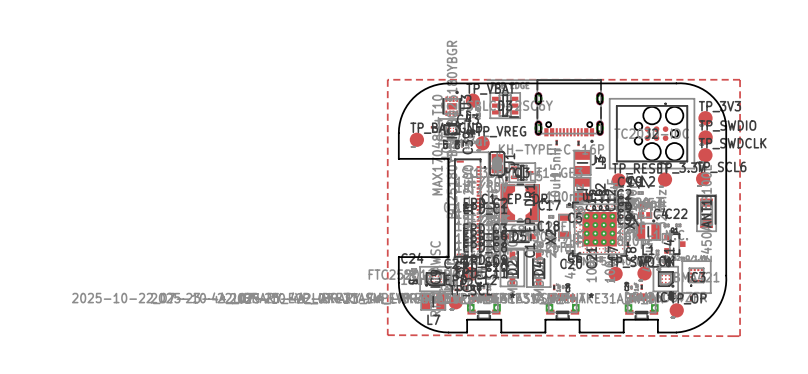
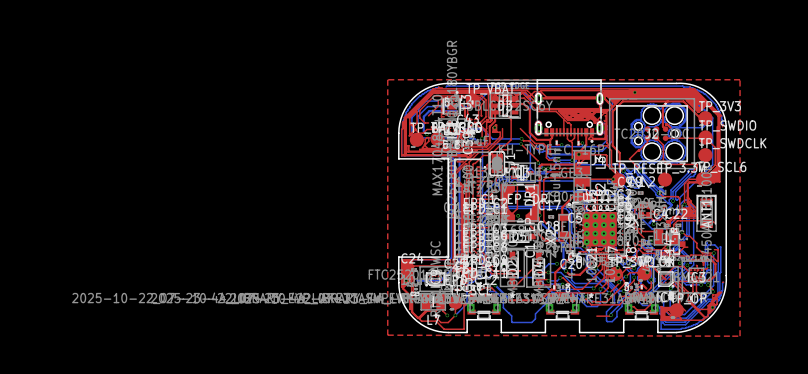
top track: none -> (438, 87) (442, 87)
bottom track: none -> (438, 87) (419, 96) (406, 112) (401, 129) (401, 155) (449, 155) (451, 157) (451, 257) (449, 259) (401, 259) (401, 279) (406, 280)
bottom track: none -> (445, 87) (690, 87) (705, 94) (716, 105) (723, 124)
top track: none -> (690, 87) (690, 87)
top track: none -> (433, 89) (405, 117) (405, 155) (466, 155)
top track: none -> (629, 89) (694, 90) (719, 115) (719, 181) (689, 181) (687, 183) (688, 197)
top track: none -> (634, 92) (635, 91) (636, 91) (642, 96) (643, 96) (646, 93) (647, 93) (649, 95) (650, 95) (651, 94) (694, 94) (694, 95) (651, 95) (649, 93) (648, 93) (644, 96) (643, 96) (638, 91) (637, 91) (630, 98) (629, 98) (623, 92) (620, 92) (615, 96) (617, 98) (615, 101) (612, 99) (612, 98) (618, 92) (619, 92) (625, 98) (626, 98) (634, 91) (634, 91) (640, 96) (641, 96) (644, 93) (645, 93) (648, 96) (696, 96) (694, 93) (650, 93) (646, 96) (645, 96) (640, 91) (639, 91) (632, 98) (631, 98) (624, 92) (624, 92) (618, 97) (617, 97) (614, 94) (613, 94) (610, 96) (609, 96) (611, 94) (612, 94) (618, 100) (620, 98) (615, 93) (610, 93) (608, 95) (608, 96) (611, 97) (616, 92) (617, 92) (624, 98) (624, 98) (632, 91) (633, 91) (638, 96) (639, 96) (643, 92) (694, 92) (698, 96) (647, 96) (642, 91) (641, 91) (634, 98) (633, 98) (626, 92) (625, 92) (616, 101) (615, 101) (605, 91) (605, 91) (605, 92) (607, 95) (607, 96) (615, 103) (617, 101) (607, 91) (606, 91) (604, 94) (604, 96) (605, 97) (605, 98) (612, 105) (615, 104) (602, 91) (602, 90) (608, 90) (610, 92) (615, 92) (622, 98) (623, 98) (630, 91) (631, 91) (637, 97) (699, 97) (694, 91) (643, 91) (635, 98) (634, 98) (627, 91) (610, 91) (603, 98) (601, 99) (601, 107)
via: none -> (634, 92)
top track: none -> (490, 93) (433, 93) (408, 117)
top track: none -> (489, 94) (488, 116) (491, 118)
top track: none -> (527, 96) (526, 96) (521, 92) (521, 92) (511, 101) (498, 101) (493, 96) (493, 92) (505, 92) (514, 101) (518, 100) (516, 98) (515, 98) (510, 93) (507, 93) (500, 100) (494, 96) (494, 93) (504, 93) (512, 101) (513, 101) (515, 99) (516, 99) (517, 98) (517, 96) (513, 93) (511, 93) (503, 100) (501, 100) (495, 95) (495, 94) (503, 94) (510, 100) (511, 100) (518, 93) (519, 93) (520, 94) (521, 94) (522, 92) (525, 92) (533, 100) (533, 103) (527, 97) (529, 96) (534, 91) (539, 91) (538, 96) (540, 97) (598, 97) (601, 95) (601, 90) (540, 91) (546, 96) (598, 96) (600, 95) (612, 106) (610, 108)
top track: none -> (442, 98) (443, 114)
top track: none -> (520, 98) (524, 98) (537, 111) (556, 111) (570, 124) (570, 132)
top track: none -> (599, 98) (599, 108) (539, 108) (538, 101) (527, 90) (433, 90) (406, 117) (406, 154) (466, 154) (472, 149) (487, 149) (500, 136) (500, 132) (492, 132) (492, 127) (496, 124) (496, 131) (493, 131) (494, 126) (495, 130) (494, 127)
top track: none -> (599, 98) (540, 98) (537, 101) (537, 107) (539, 109) (610, 109) (630, 89) (694, 89) (720, 115)
top track: none -> (438, 100) (438, 106) (428, 115)
bottom track: none -> (438, 100) (426, 101) (411, 117) (411, 135) (414, 137) (455, 137) (464, 128) (482, 128) (492, 138) (521, 138)
top track: none -> (667, 101) (662, 106) (662, 126) (665, 129)
part: none -> (472, 102)
top track: none -> (478, 102) (478, 119) (474, 119)
top track: none -> (468, 103) (468, 98) (480, 97) (483, 101) (481, 105) (482, 115)
top track: none -> (458, 104) (465, 108) (465, 116) (471, 119)
top track: none -> (697, 105) (698, 106)
bottom track: none -> (699, 105) (712, 117) (702, 127) (671, 126) (663, 118) (662, 120) (671, 127)
top track: none -> (700, 105) (700, 105)
top track: none -> (699, 107) (695, 104) (702, 105) (698, 108) (693, 103) (703, 105) (698, 109) (691, 102) (701, 102) (704, 105) (698, 110) (690, 101) (701, 101) (705, 105) (698, 111) (688, 100) (701, 100) (706, 105) (698, 112) (686, 99) (701, 99) (718, 115) (718, 165) (703, 181) (718, 181) (718, 115) (701, 98) (636, 98) (628, 90) (609, 90) (600, 99) (601, 108)
bottom track: none -> (456, 111) (429, 111) (423, 116) (423, 131) (426, 134)
top track: none -> (595, 112) (594, 112) (587, 118) (587, 118) (581, 113) (580, 113) (576, 117) (575, 117) (571, 114) (567, 114) (567, 115) (569, 117) (570, 117) (575, 113) (576, 113) (582, 119) (587, 119) (588, 118) (583, 113) (582, 113) (577, 117) (577, 117) (572, 113) (564, 113) (568, 117) (574, 112) (584, 112) (590, 118) (594, 121) (595, 123) (596, 122) (586, 112) (585, 112) (578, 118) (568, 118) (562, 113) (573, 112) (580, 119) (581, 119) (589, 111) (596, 111) (596, 112) (604, 112) (605, 113) (605, 113) (605, 112) (596, 120) (596, 120) (587, 111) (560, 111) (568, 119) (579, 119) (588, 110) (596, 110) (597, 111) (606, 111) (606, 143) (609, 144) (609, 110) (597, 110) (587, 120) (568, 120) (558, 110) (587, 110) (598, 121) (601, 121)
top track: none -> (468, 114) (467, 97) (441, 97) (441, 116) (444, 116)
top track: none -> (502, 115) (506, 115) (511, 119) (511, 139) (505, 145) (499, 145) (490, 155) (483, 155) (473, 164) (473, 249) (493, 270) (520, 270)
top track: none -> (605, 115) (605, 121) (604, 120)
top track: none -> (721, 115) (694, 88) (433, 88) (404, 117) (404, 155) (401, 155) (402, 122) (403, 128)
part position: (473, 116) -> (452, 102)
top track: none -> (407, 117) (433, 91) (492, 91) (492, 120) (486, 122) (486, 128) (484, 130) (485, 143) (466, 143) (461, 137) (461, 134) (470, 134) (460, 134) (460, 137) (466, 143) (485, 143) (486, 131) (481, 125) (481, 124) (484, 121) (488, 121)
top track: none -> (408, 117) (433, 92) (491, 92) (491, 120) (489, 121)
top track: none -> (490, 117) (487, 119)
top track: none -> (705, 118) (700, 118) (683, 101) (622, 101) (612, 111) (612, 145) (619, 152) (619, 168) (623, 171)
top track: none -> (563, 119) (563, 132)
top track: none -> (474, 122) (480, 122) (486, 116) (486, 99) (481, 95) (434, 95) (419, 110) (419, 118) (424, 122) (428, 122)
top track: none -> (474, 122) (482, 129) (482, 138)
bottom track: none -> (417, 123) (417, 116) (427, 106) (474, 106) (486, 93) (525, 93) (530, 98) (530, 169) (522, 176) (501, 176) (485, 192) (485, 273)
bottom track: none -> (604, 123) (606, 125) (604, 132) (606, 140) (600, 146) (543, 146) (540, 144) (537, 149) (539, 152) (548, 151) (547, 155) (549, 158) (555, 157) (555, 162) (556, 163) (557, 164) (623, 164) (631, 172) (630, 173) (640, 183) (638, 188) (633, 187) (633, 184) (619, 171) (622, 167) (624, 167) (630, 172) (643, 159) (641, 155) (641, 148) (635, 147) (631, 143) (631, 124) (636, 119) (641, 119) (642, 109) (650, 104) (656, 105) (661, 108) (665, 104) (679, 103) (686, 110) (686, 119) (680, 126) (685, 118) (685, 112) (676, 104) (670, 105) (664, 109) (663, 117) (654, 126) (648, 126) (643, 132) (644, 124) (642, 121) (636, 120) (632, 124) (635, 132) (641, 132) (645, 136) (644, 141) (642, 135) (634, 135) (632, 142) (635, 146) (642, 146) (644, 142) (653, 140) (656, 141) (662, 146) (662, 147) (663, 149) (663, 150) (668, 142) (675, 140) (676, 139) (677, 139) (680, 136) (681, 132) (676, 127) (671, 128) (668, 134) (671, 139) (675, 139) (677, 141) (679, 141) (685, 148) (683, 158) (677, 162) (668, 161) (663, 152) (661, 158) (654, 162) (643, 161) (643, 173) (663, 190) (663, 194) (662, 196) (661, 189) (658, 189) (643, 173) (643, 169) (641, 167) (635, 169) (637, 174) (655, 194) (661, 196) (671, 205) (656, 219) (652, 219) (649, 223) (652, 220) (656, 220) (671, 205) (669, 202) (671, 190) (690, 169) (692, 169) (695, 173) (675, 191) (676, 199) (712, 164) (712, 118) (692, 97) (612, 97) (612, 141) (602, 151) (581, 151) (582, 155) (579, 158) (575, 157) (574, 163) (557, 163) (547, 173) (530, 171) (523, 179) (518, 180)
top track: none -> (605, 123) (605, 138) (593, 138) (590, 135) (591, 130) (593, 134) (588, 138) (588, 139) (605, 139) (605, 123)
top track: none -> (723, 124) (722, 126)
top track: none -> (471, 125) (465, 131) (457, 131) (457, 139) (465, 146) (486, 146) (489, 143) (489, 126) (495, 121) (495, 107) (498, 104) (523, 104) (529, 110) (529, 132) (536, 139) (550, 139)
top track: none -> (670, 126) (667, 124) (666, 124) (665, 124) (665, 124) (666, 124) (670, 127) (671, 127)
top track: none -> (717, 126) (718, 180) (705, 180) (705, 179) (717, 168) (717, 179) (707, 179) (715, 170) (716, 170) (716, 178) (709, 178) (715, 171) (715, 177) (710, 177) (714, 173) (713, 175)
via: none -> (494, 127)
top track: none -> (434, 128) (445, 128) (446, 124) (450, 121) (450, 124) (445, 129) (427, 129) (423, 133) (418, 133) (415, 129) (409, 134) (409, 124) (410, 123) (414, 125) (417, 123) (416, 111) (409, 117) (409, 123) (416, 129) (409, 135) (408, 135)
top track: none -> (502, 128) (502, 137) (487, 152) (478, 152) (469, 162) (469, 251) (491, 273) (512, 273) (515, 277)
top track: none -> (520, 128) (535, 143) (543, 143) (546, 146) (546, 157) (548, 160) (558, 160)
top track: none -> (552, 132) (550, 139)
top track: none -> (567, 132) (569, 140) (574, 138) (574, 132)
top track: none -> (578, 132) (578, 140)
top track: none -> (586, 132) (586, 145) (578, 152) (578, 161) (576, 164) (541, 164) (539, 166) (539, 215)
via: none -> (426, 134)
bottom track: none -> (469, 138) (474, 138) (482, 146) (482, 267) (480, 270) (480, 276) (482, 278) (488, 278) (490, 275) (488, 269) (488, 215) (495, 208) (565, 208) (569, 211) (569, 234) (575, 241) (581, 241) (584, 246)
bottom track: none -> (482, 138) (487, 143) (521, 143)
via: none -> (482, 138)
top track: none -> (521, 138) (529, 140) (536, 148) (541, 148)
via: none -> (521, 138)
top track: none -> (647, 138) (647, 142) (629, 159) (639, 170)
top track: none -> (656, 138) (663, 144) (663, 160) (667, 164) (697, 164) (697, 167) (691, 172)
top track: none -> (665, 138) (705, 137) (715, 147) (715, 165) (701, 179) (688, 179) (684, 183) (684, 204)
top track: none -> (550, 139) (550, 154)
top track: none -> (570, 140) (572, 142) (572, 160)
TP_VREG position: (482, 143) -> (437, 139)
top track: none -> (521, 143) (538, 162)
via: none -> (521, 143)
top track: none -> (582, 143) (578, 144)
bottom track: none -> (582, 143) (582, 146)
via: none -> (582, 143)
bottom track: none -> (448, 144) (459, 154) (459, 261) (440, 280) (417, 280)
top track: none -> (556, 144) (561, 144)
via: none -> (561, 144)
top track: none -> (597, 145) (606, 145) (611, 150) (611, 166) (619, 174) (619, 185) (622, 188)
top track: none -> (443, 146) (444, 144) (445, 147)
bottom track: none -> (444, 146) (444, 149) (453, 158) (453, 177)
top track: none -> (427, 147) (424, 144) (425, 139) (428, 137) (428, 141) (422, 147) (422, 148) (452, 148) (452, 142) (456, 142) (463, 149) (419, 150) (469, 150) (408, 151) (408, 145) (408, 152) (464, 152)
top track: none -> (509, 149) (501, 150) (501, 159) (498, 161) (490, 161) (485, 170) (479, 170)
top track: none -> (474, 150) (476, 150) (474, 152)
top track: none -> (466, 153) (471, 149) (474, 152) (470, 157) (468, 156)
top track: none -> (402, 154) (403, 154)
top track: none -> (471, 154) (472, 151) (468, 153) (471, 155)
bottom track: none -> (578, 154) (550, 154)
via: none -> (578, 154)
bottom track: none -> (558, 160) (572, 160)
via: none -> (558, 160)
via: none -> (572, 160)
bottom track: none -> (538, 162) (543, 168)
via: none -> (538, 162)
bottom track: none -> (530, 167) (534, 171) (544, 171) (548, 168)
top track: none -> (543, 168) (547, 171) (582, 171) (589, 179) (613, 179)
via: none -> (543, 168)
top track: none -> (548, 168) (576, 168) (588, 154) (605, 154) (606, 164) (615, 175)
via: none -> (548, 168)
bottom track: none -> (639, 170) (639, 173) (659, 192)
via: none -> (639, 170)
bottom track: none -> (623, 171) (636, 185)
via: none -> (623, 171)
bottom track: none -> (691, 172) (673, 191) (673, 201)
top track: none -> (496, 175) (496, 181)
bottom track: none -> (615, 175) (630, 191) (630, 207) (652, 228) (665, 228) (677, 217) (676, 208) (684, 199) (693, 207) (693, 265) (678, 277) (686, 284) (701, 284)
top track: none -> (452, 176) (451, 156) (466, 156) (468, 158) (452, 174) (466, 189) (466, 283) (462, 283) (462, 185) (453, 176) (465, 163) (466, 163) (466, 188) (463, 191) (463, 282) (465, 282) (465, 190) (463, 187) (463, 186) (465, 183)
part: (500, 176) -> none
top track: none -> (453, 177) (453, 271) (461, 271) (461, 185) (454, 179) (454, 270) (460, 270) (460, 256) (455, 256) (455, 269) (459, 269)
part: (506, 178) -> none
bottom track: none -> (511, 179) (502, 179) (496, 184) (501, 190) (504, 188) (503, 183) (506, 181) (510, 182) (513, 179) (517, 181) (609, 181) (615, 186) (616, 185) (616, 188) (626, 196) (624, 201) (619, 199) (615, 193) (609, 196) (605, 190) (576, 190) (587, 201) (587, 228) (593, 228) (598, 233) (598, 246) (613, 246) (615, 247) (615, 256) (619, 256) (624, 264) (642, 247) (647, 249) (646, 256) (643, 255) (634, 265) (630, 266) (633, 274) (647, 260) (648, 249) (643, 246) (644, 240) (650, 243) (654, 250) (665, 250) (663, 254) (656, 252) (653, 255) (654, 281) (652, 283) (647, 281) (648, 275) (640, 275) (637, 276) (641, 283) (638, 292) (650, 292) (674, 267) (679, 266) (681, 271) (675, 275) (675, 284) (670, 290) (670, 311)
via: none -> (613, 179)
top track: none -> (479, 181) (492, 181)
top track: none -> (714, 182) (689, 182) (688, 196)
top track: none -> (514, 183) (517, 185) (517, 208) (512, 213) (479, 213)
via: none -> (514, 183)
top track: none -> (597, 186) (597, 209)
top track: none -> (496, 189) (489, 195) (479, 195)
bottom track: none -> (505, 191) (572, 191) (584, 203) (584, 227)
top track: none -> (659, 192) (662, 196) (677, 196) (679, 198) (679, 212)
via: none -> (659, 192)
top track: none -> (581, 194) (575, 194) (562, 207) (562, 231) (570, 237) (570, 257) (555, 272) (555, 289) (551, 289) (540, 300) (509, 300)
top track: none -> (496, 196) (494, 199) (479, 199)
top track: none -> (689, 198) (687, 198) (687, 202) (696, 211)
via: none -> (673, 201)
top track: none -> (582, 204) (584, 209)
top track: none -> (586, 204) (586, 207) (592, 212)
top track: none -> (664, 204) (656, 215) (647, 208)
bottom track: none -> (684, 204) (686, 206) (686, 234) (664, 256) (657, 256)
via: none -> (684, 204)
top track: none -> (643, 208) (636, 207) (634, 214)
bottom track: none -> (485, 209) (487, 206) (567, 206) (571, 210) (571, 232) (576, 237)
top track: none -> (638, 209) (653, 220) (659, 220) (664, 215)
top track: none -> (689, 209) (684, 209) (684, 211) (686, 213) (691, 213) (692, 211) (690, 209) (690, 209) (687, 212) (685, 209) (688, 210) (690, 212) (690, 210)
top track: none -> (696, 210) (696, 208) (690, 201) (688, 202) (688, 199) (690, 200) (690, 201) (688, 204) (690, 207) (682, 215) (696, 215)
bottom track: none -> (690, 211) (689, 210) (689, 206) (690, 206) (690, 210) (689, 211) (689, 235) (675, 248) (676, 249) (680, 249) (690, 263) (690, 258) (681, 249) (676, 248) (675, 249) (675, 250) (674, 251) (676, 256) (679, 256) (684, 261) (683, 266) (685, 268) (682, 270)
top track: none -> (694, 211) (689, 207) (683, 208) (684, 214) (692, 214)
bottom track: none -> (679, 212) (682, 215) (682, 232)
top track: none -> (695, 212) (693, 214)
via: none -> (518, 215)
bottom track: none -> (539, 215) (539, 220) (563, 245) (563, 268) (565, 271)
via: none -> (539, 215)
top track: none -> (697, 216) (677, 216) (675, 218) (674, 218) (673, 217) (672, 217) (668, 221) (668, 222) (666, 221) (668, 220) (670, 222) (670, 226) (668, 223) (675, 216) (676, 216) (678, 218) (698, 218)
top track: none -> (677, 217) (673, 221)
top track: none -> (634, 221) (636, 228) (640, 228) (642, 231) (653, 231) (659, 236)
top track: none -> (714, 222) (712, 220) (677, 220) (673, 224) (673, 236)
top track: none -> (492, 223) (488, 227) (479, 227)
top track: none -> (547, 223) (543, 220) (543, 179) (546, 177) (584, 177) (584, 189) (594, 198) (594, 209) (596, 212) (595, 232)
bottom track: none -> (547, 223) (572, 247) (580, 247) (586, 253) (586, 270) (597, 281) (604, 281) (614, 291) (614, 303) (606, 311) (607, 321) (612, 321) (616, 316) (616, 311) (622, 306) (622, 302) (629, 295) (632, 295) (642, 305) (657, 305) (665, 322) (685, 322) (707, 299) (713, 299) (717, 294) (718, 248) (714, 244) (707, 245) (707, 264) (709, 266)
via: none -> (653, 224)
top track: none -> (664, 224) (666, 226) (666, 245) (661, 249) (644, 249) (638, 244)
top track: none -> (530, 226) (545, 240) (563, 240)
top track: none -> (638, 230) (643, 237)
L1 position: (648, 231) -> (666, 236)
top track: none -> (682, 232) (696, 243) (696, 247) (702, 253) (713, 253)
via: none -> (682, 232)
top track: none -> (592, 237) (590, 246) (585, 251) (579, 251)
bottom track: none -> (584, 238) (588, 243) (588, 268) (600, 280) (605, 280) (619, 293) (619, 296)
via: none -> (651, 240)
top track: none -> (638, 241) (643, 241) (646, 244)
bottom track: none -> (707, 242) (705, 245) (705, 267) (710, 270) (708, 269) (706, 272) (705, 283) (702, 281) (686, 282) (682, 277) (687, 281)
top track: none -> (634, 243) (636, 257) (644, 258)
bottom track: none -> (646, 244) (651, 249) (651, 279)
via: none -> (584, 246)
via: none -> (668, 247)
top track: none -> (687, 247) (684, 247) (678, 252) (673, 252) (668, 247)
bottom track: none -> (719, 247) (720, 247) (719, 273) (719, 294) (720, 294) (720, 295) (719, 295) (719, 294) (721, 293) (722, 290) (723, 282)
top track: none -> (601, 248) (594, 248) (589, 257)
top track: none -> (602, 248) (597, 250) (600, 264) (596, 267)
top track: none -> (608, 248) (608, 287) (603, 293) (556, 292) (552, 296) (552, 302)
top track: none -> (615, 248) (602, 248)
top track: none -> (638, 248) (643, 253) (654, 253) (657, 256)
top track: none -> (479, 249) (492, 266)
top track: none -> (714, 249) (718, 249) (718, 261) (710, 255) (661, 256) (661, 252) (671, 252) (669, 255) (662, 255) (662, 253)
top track: none -> (543, 251) (538, 256) (538, 263) (512, 288)
bottom track: none -> (579, 251) (579, 256) (571, 264) (571, 280) (574, 283) (599, 283) (609, 293)
top track: none -> (595, 252) (593, 260) (579, 274) (569, 274) (565, 271)
top track: none -> (599, 252) (602, 255) (602, 269) (582, 289) (574, 289) (563, 277) (560, 277)
top track: none -> (602, 252) (604, 277) (593, 288)
top track: none -> (606, 252) (606, 283) (600, 289)
top track: none -> (617, 252) (622, 257) (633, 257) (641, 265) (652, 265) (665, 279)
top track: none -> (631, 252) (629, 250) (616, 250) (615, 257) (617, 260)
bottom track: none -> (713, 253) (713, 285) (684, 314) (669, 314) (663, 309) (663, 302) (656, 295)
via: none -> (713, 253)
top track: none -> (687, 259) (711, 259) (715, 263) (715, 275) (710, 280) (703, 280) (700, 276)
top track: none -> (701, 259) (703, 265)
bottom track: none -> (617, 260) (630, 272) (630, 281) (628, 284) (628, 293) (619, 302) (619, 305) (611, 315)
bottom track: none -> (556, 263) (549, 263) (543, 269) (543, 283) (552, 292) (576, 292) (585, 300) (592, 300)
via: none -> (556, 263)
via: none -> (679, 263)
via: none -> (630, 265)
via: none -> (687, 265)
top track: none -> (696, 265) (697, 271)
top track: none -> (709, 266) (703, 269)
via: none -> (709, 266)
bottom track: none -> (596, 267) (619, 291) (623, 291)
via: none -> (596, 267)
via: none -> (617, 267)
top track: none -> (634, 268) (626, 268) (622, 272) (624, 284) (606, 301) (592, 301)
via: none -> (634, 268)
bottom track: none -> (678, 270) (675, 270) (651, 294) (637, 294) (637, 284)
via: none -> (565, 271)
top track: none -> (537, 272) (548, 272)
bottom track: none -> (548, 272) (560, 272) (575, 287) (593, 288)
via: none -> (548, 272)
via: none -> (647, 272)
top track: none -> (692, 272) (689, 272) (683, 266) (674, 266) (665, 275)
via: none -> (618, 274)
top track: none -> (626, 276) (630, 272) (637, 272) (637, 284)
bottom track: none -> (626, 276) (619, 282)
via: none -> (626, 276)
top track: none -> (692, 276) (691, 293)
part position: (414, 277) -> (415, 289)
bottom track: none -> (515, 277) (534, 277) (536, 279)
bottom track: none -> (560, 277) (557, 280) (548, 280)
via: none -> (560, 277)
top track: none -> (634, 277) (634, 280) (623, 291)
via: none -> (634, 277)
top track: none -> (412, 278) (412, 259) (450, 259) (450, 265) (413, 265) (412, 312) (418, 317) (435, 301) (437, 303) (437, 309) (427, 311) (419, 319) (421, 321) (436, 321) (444, 329) (464, 329) (464, 304) (469, 304) (469, 293) (471, 292) (471, 295) (470, 294)
bottom track: none -> (477, 278) (466, 285) (466, 303) (455, 315)
top track: none -> (536, 279) (548, 280)
top track: none -> (651, 279) (651, 287) (646, 292) (639, 292) (631, 302)
via: none -> (651, 279)
top track: none -> (672, 279) (684, 291) (684, 294)
top track: none -> (406, 280) (407, 264) (407, 280) (405, 281) (405, 263) (408, 263) (408, 280) (404, 283) (404, 262) (408, 262) (408, 280) (403, 284) (403, 261) (409, 261) (409, 280) (402, 286) (402, 260) (410, 260) (410, 280) (402, 288) (409, 295) (410, 309) (410, 295) (401, 286) (401, 259) (411, 259) (411, 312) (417, 318) (436, 298)
via: none -> (406, 280)
via: none -> (548, 280)
top track: none -> (687, 281) (678, 282) (688, 292) (688, 300) (705, 317) (708, 315) (708, 305) (721, 292)
top track: none -> (619, 282) (609, 293)
via: none -> (619, 282)
top track: none -> (672, 282) (679, 290) (679, 305) (685, 311)
top track: none -> (722, 282) (723, 282)
top track: none -> (550, 284) (542, 284) (538, 288)
bottom track: none -> (562, 284) (550, 284)
via: none -> (562, 284)
top track: none -> (701, 284) (701, 280) (696, 276) (696, 291) (703, 298)
via: none -> (701, 284)
top track: none -> (708, 284) (712, 291)
via: none -> (708, 284)
bottom track: none -> (495, 285) (509, 300)
via: none -> (495, 285)
bottom track: none -> (558, 287) (560, 289) (577, 289) (586, 296)
via: none -> (593, 288)
top track: none -> (632, 288) (624, 296) (619, 296)
top track: none -> (646, 288) (642, 284) (619, 304) (591, 304) (586, 299) (586, 296)
via: none -> (670, 288)
top track: none -> (481, 289) (483, 287) (491, 287) (494, 291)
bottom track: none -> (600, 289) (600, 303) (597, 306) (586, 306) (575, 295) (548, 295) (546, 297) (546, 303) (535, 313) (535, 318) (531, 322) (512, 322) (511, 315) (508, 313)
via: none -> (600, 289)
bottom track: none -> (489, 291) (495, 291) (503, 299) (503, 307) (508, 313)
via: none -> (623, 291)
bottom track: none -> (712, 291) (693, 311)
via: none -> (712, 291)
top track: none -> (718, 292) (712, 294) (712, 298) (719, 292)
top track: none -> (720, 292) (711, 301) (715, 304) (716, 304) (717, 298) (716, 298) (713, 302) (709, 306) (709, 312) (714, 308) (714, 304) (713, 303) (712, 303) (711, 303) (709, 305) (712, 309) (709, 311) (709, 307) (712, 304) (713, 308) (711, 307) (711, 306) (710, 305) (711, 304) (712, 305) (712, 307)
via: none -> (609, 293)
via: none -> (586, 296)
top track: none -> (442, 301) (442, 310) (447, 315)
top track: none -> (462, 302) (455, 309) (455, 315) (448, 322) (440, 322) (436, 317)
top track: none -> (651, 302) (644, 310) (625, 306)
bottom track: none -> (712, 307) (714, 308) (719, 296) (714, 301) (709, 301) (685, 324) (664, 324) (661, 319) (661, 329) (681, 329) (695, 324) (712, 310) (707, 309)
via: none -> (712, 307)
top track: none -> (707, 309) (698, 309) (690, 301) (689, 303) (704, 317) (702, 320) (661, 320) (661, 306) (662, 306) (674, 319) (681, 319) (670, 307) (663, 307) (662, 309) (662, 319) (673, 319) (677, 315) (670, 308) (664, 308) (662, 310) (662, 318) (672, 318) (675, 315) (670, 309) (665, 309) (663, 311) (663, 317) (671, 317) (674, 314) (670, 310) (666, 310) (664, 312) (664, 316) (671, 316) (672, 314) (670, 311)
bottom track: none -> (693, 311) (686, 318) (676, 318)
part: none -> (436, 315)
via: none -> (447, 315)
via: none -> (455, 315)
top track: none -> (611, 315) (596, 316)
via: none -> (611, 315)

